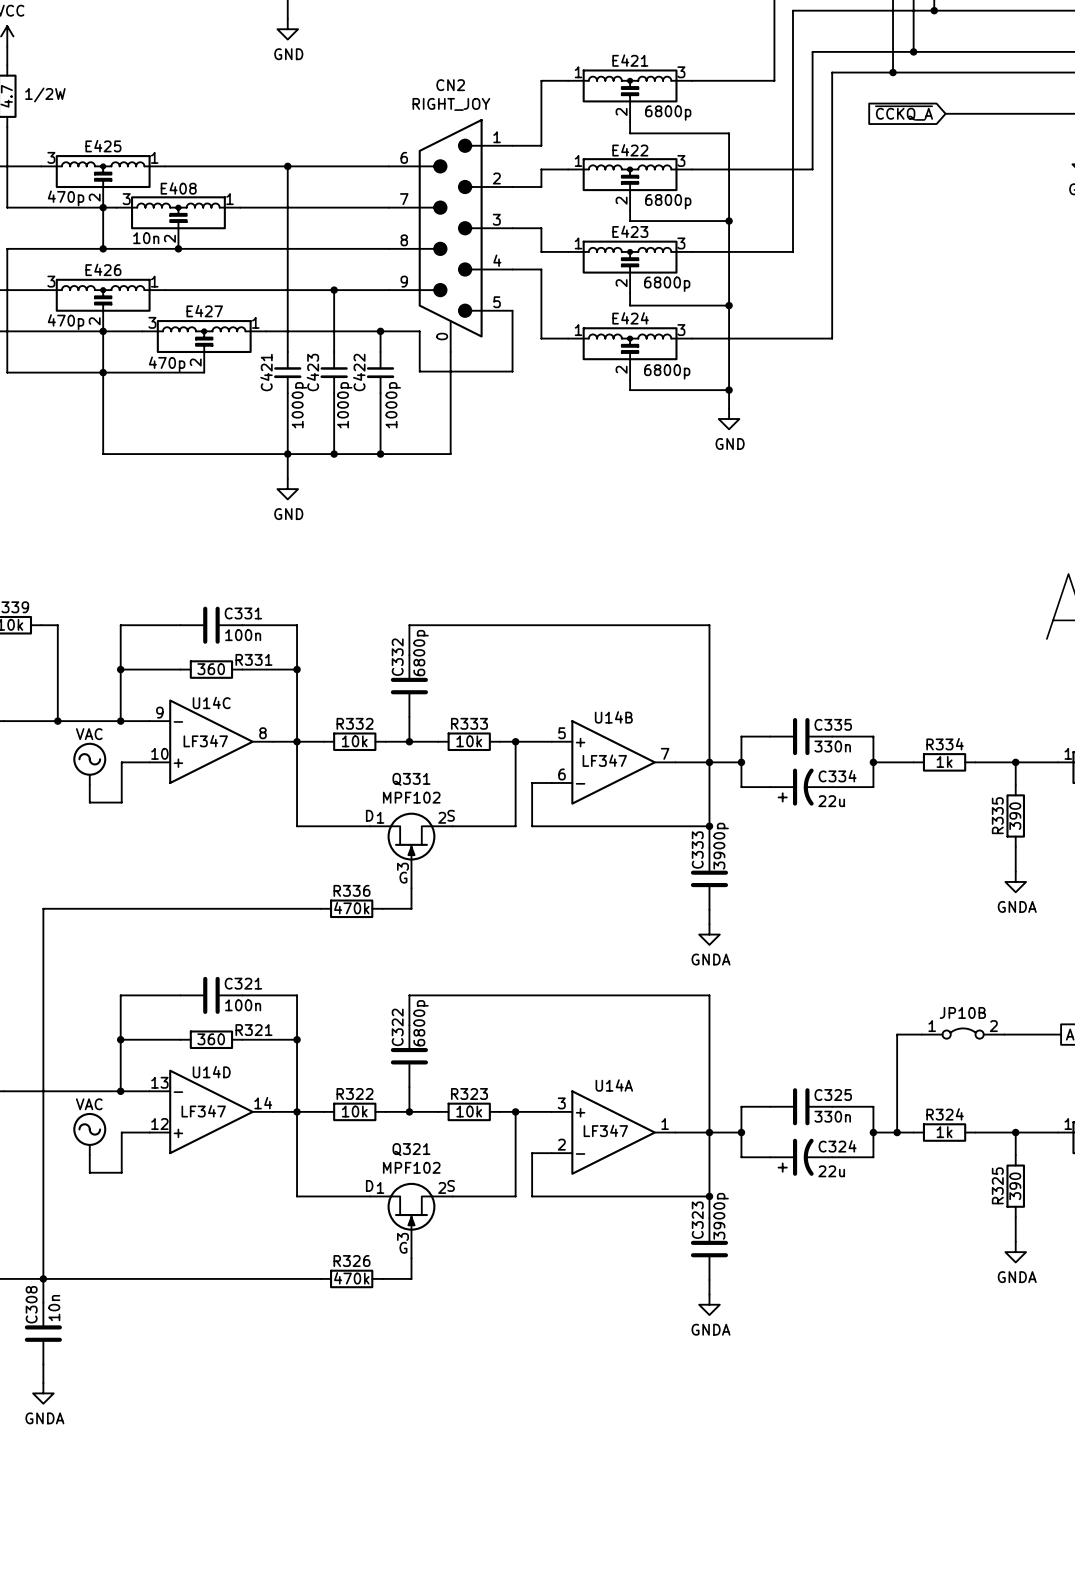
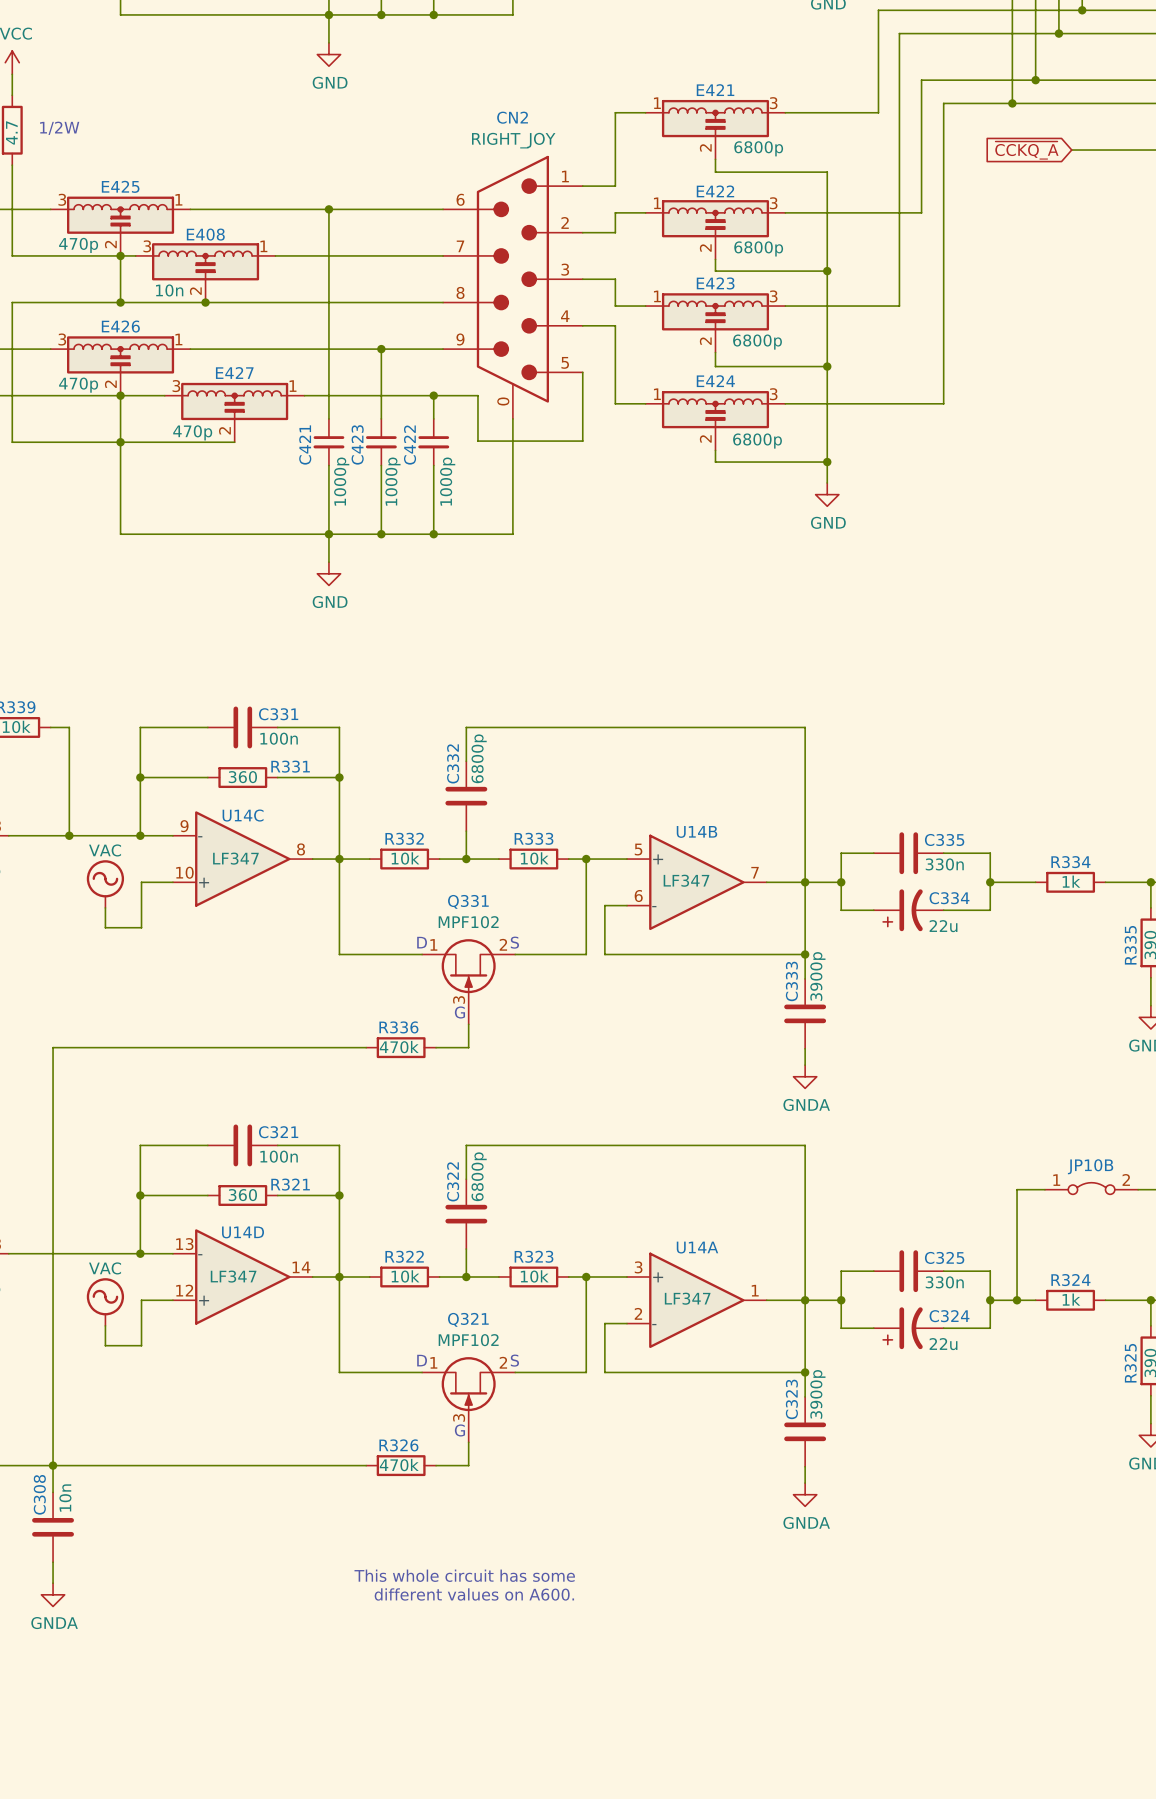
text: none -> This whole circuit has some (464, 1575)
text: none -> different values on A600. (474, 1594)

